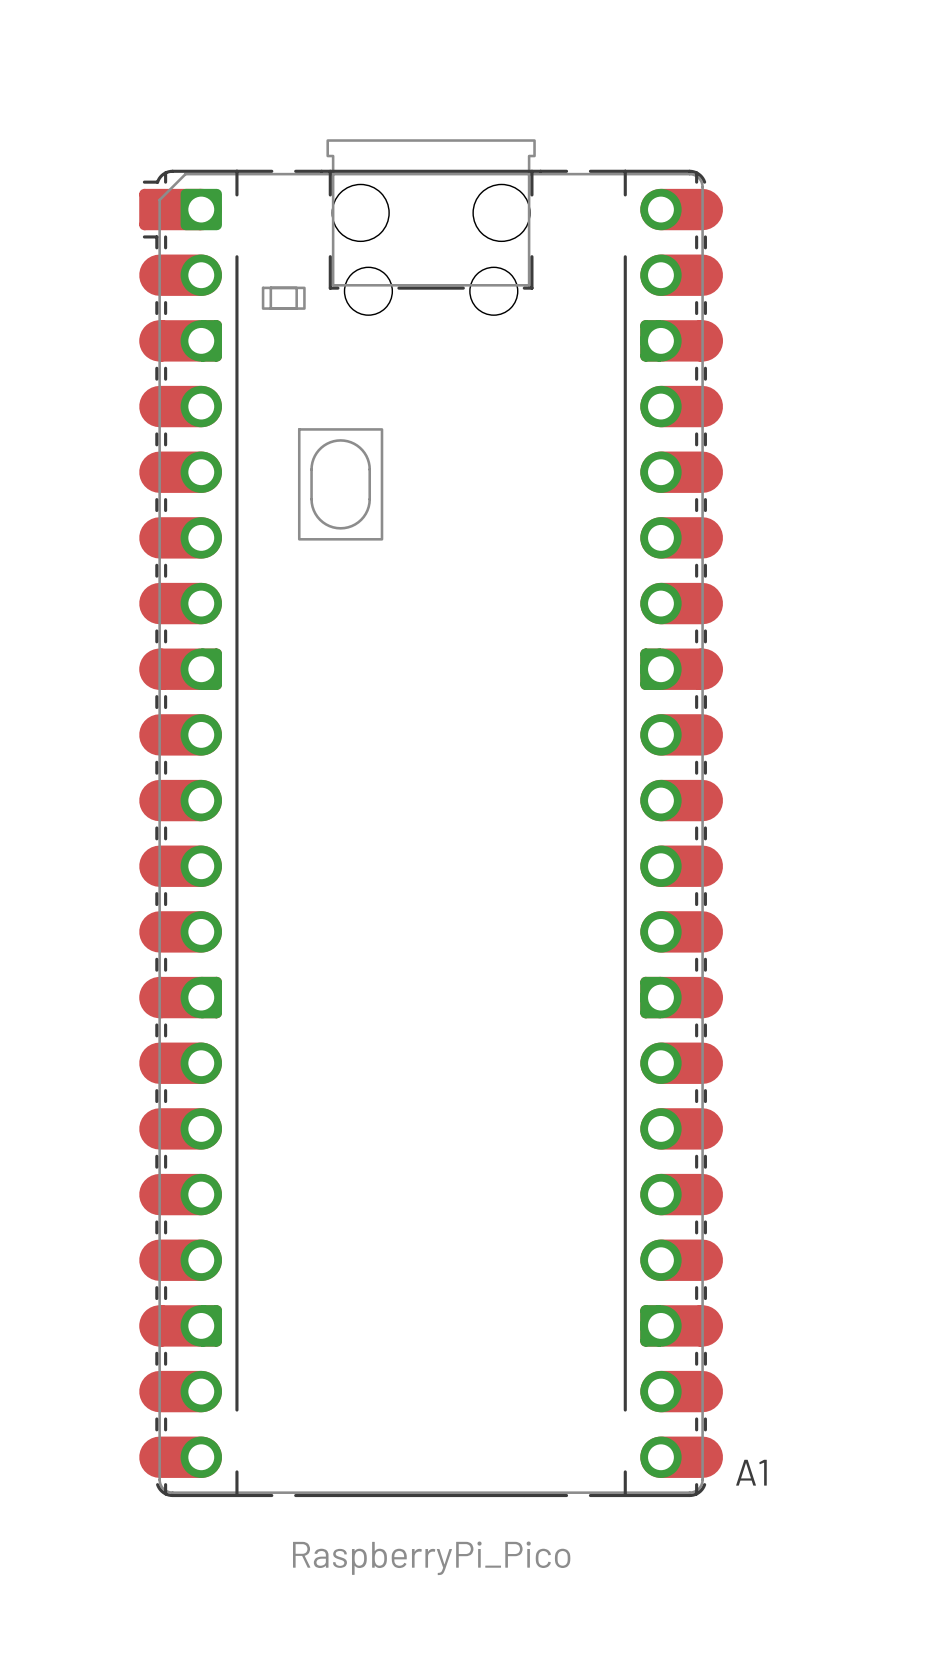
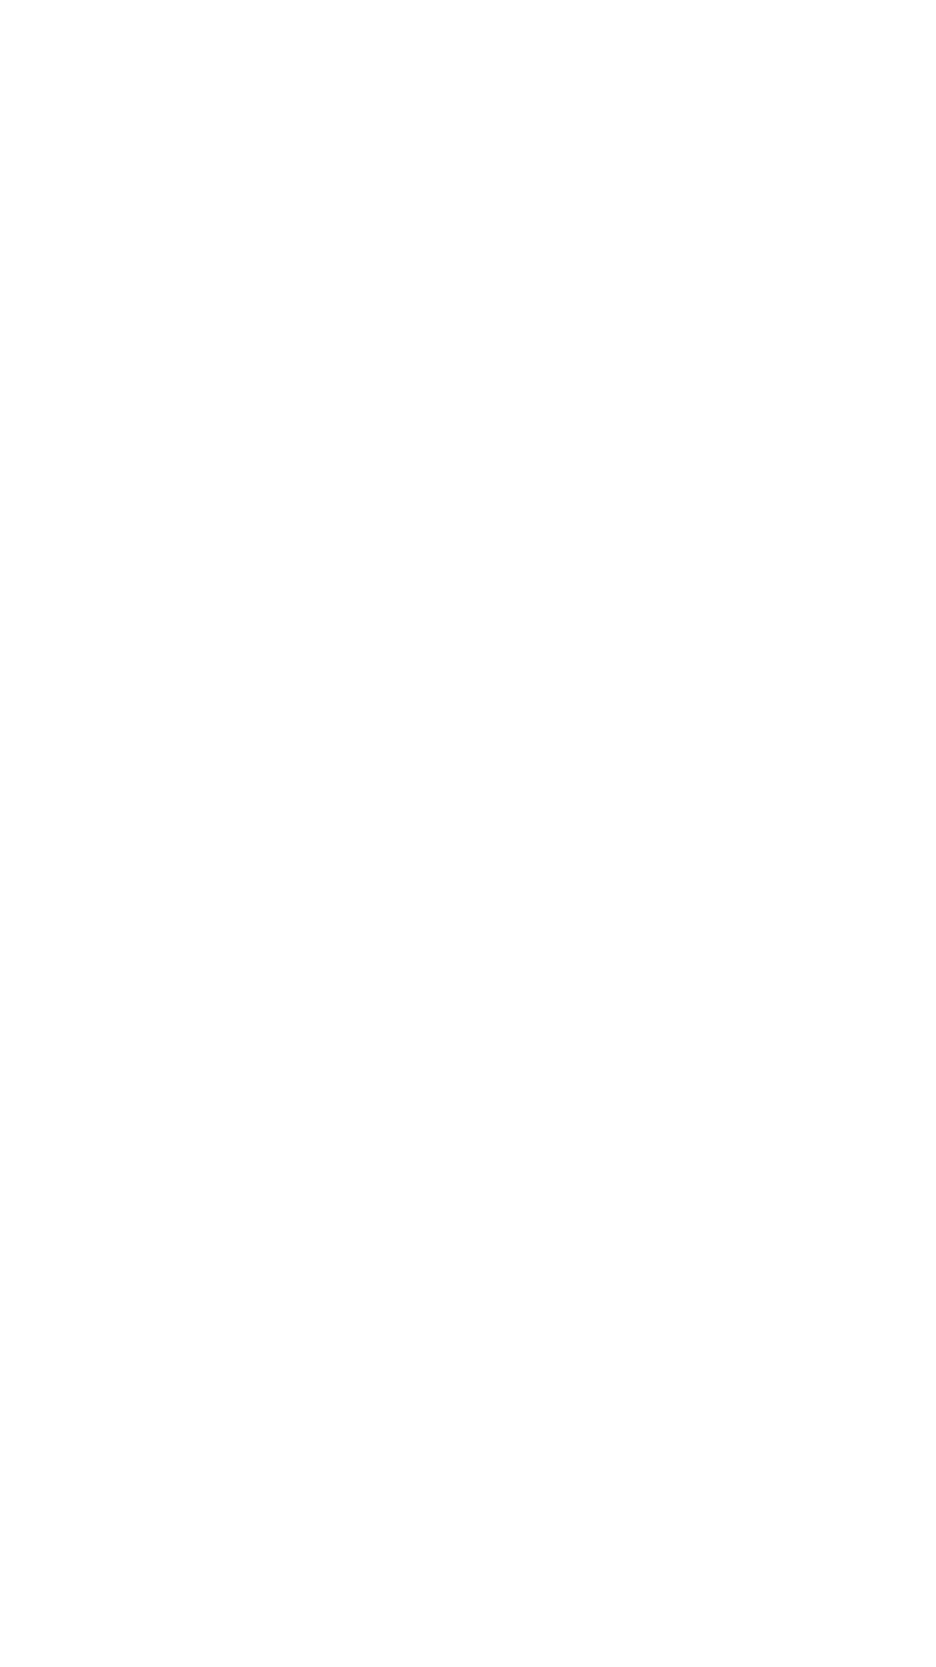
A1: RaspberryPi_Pico (431, 818) -> none

